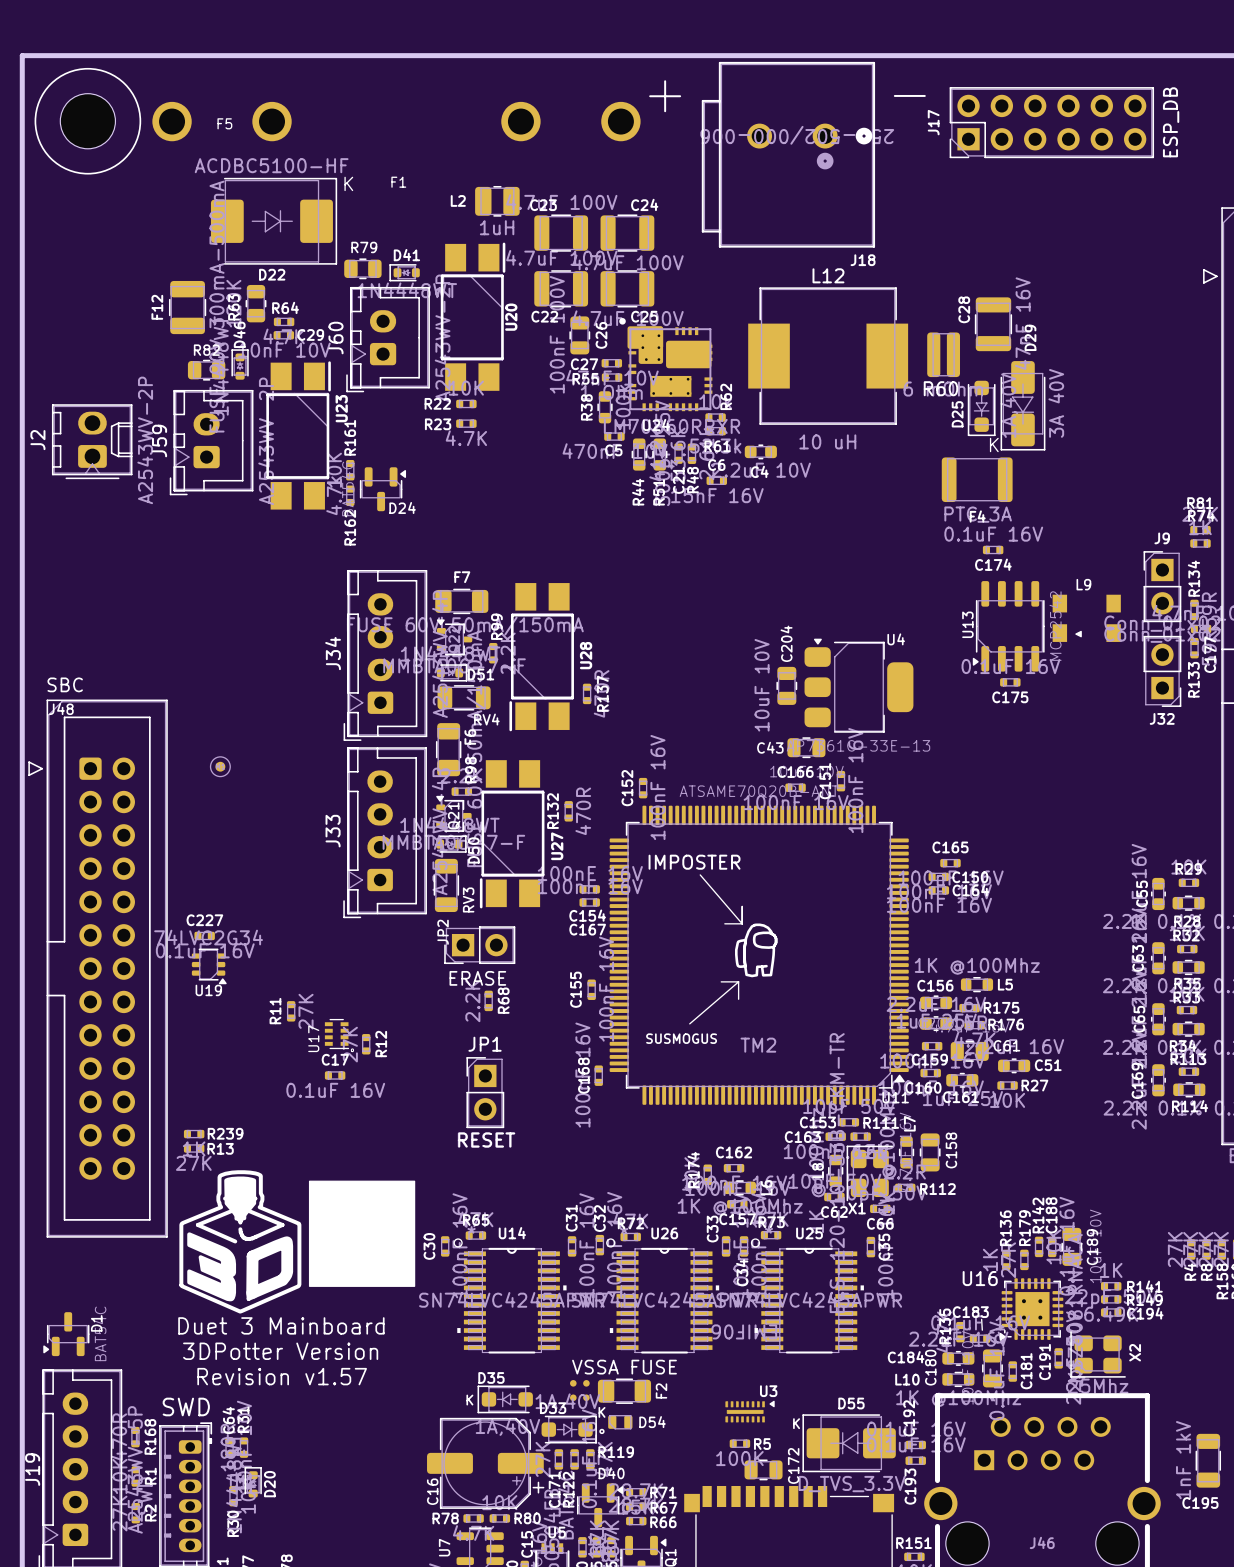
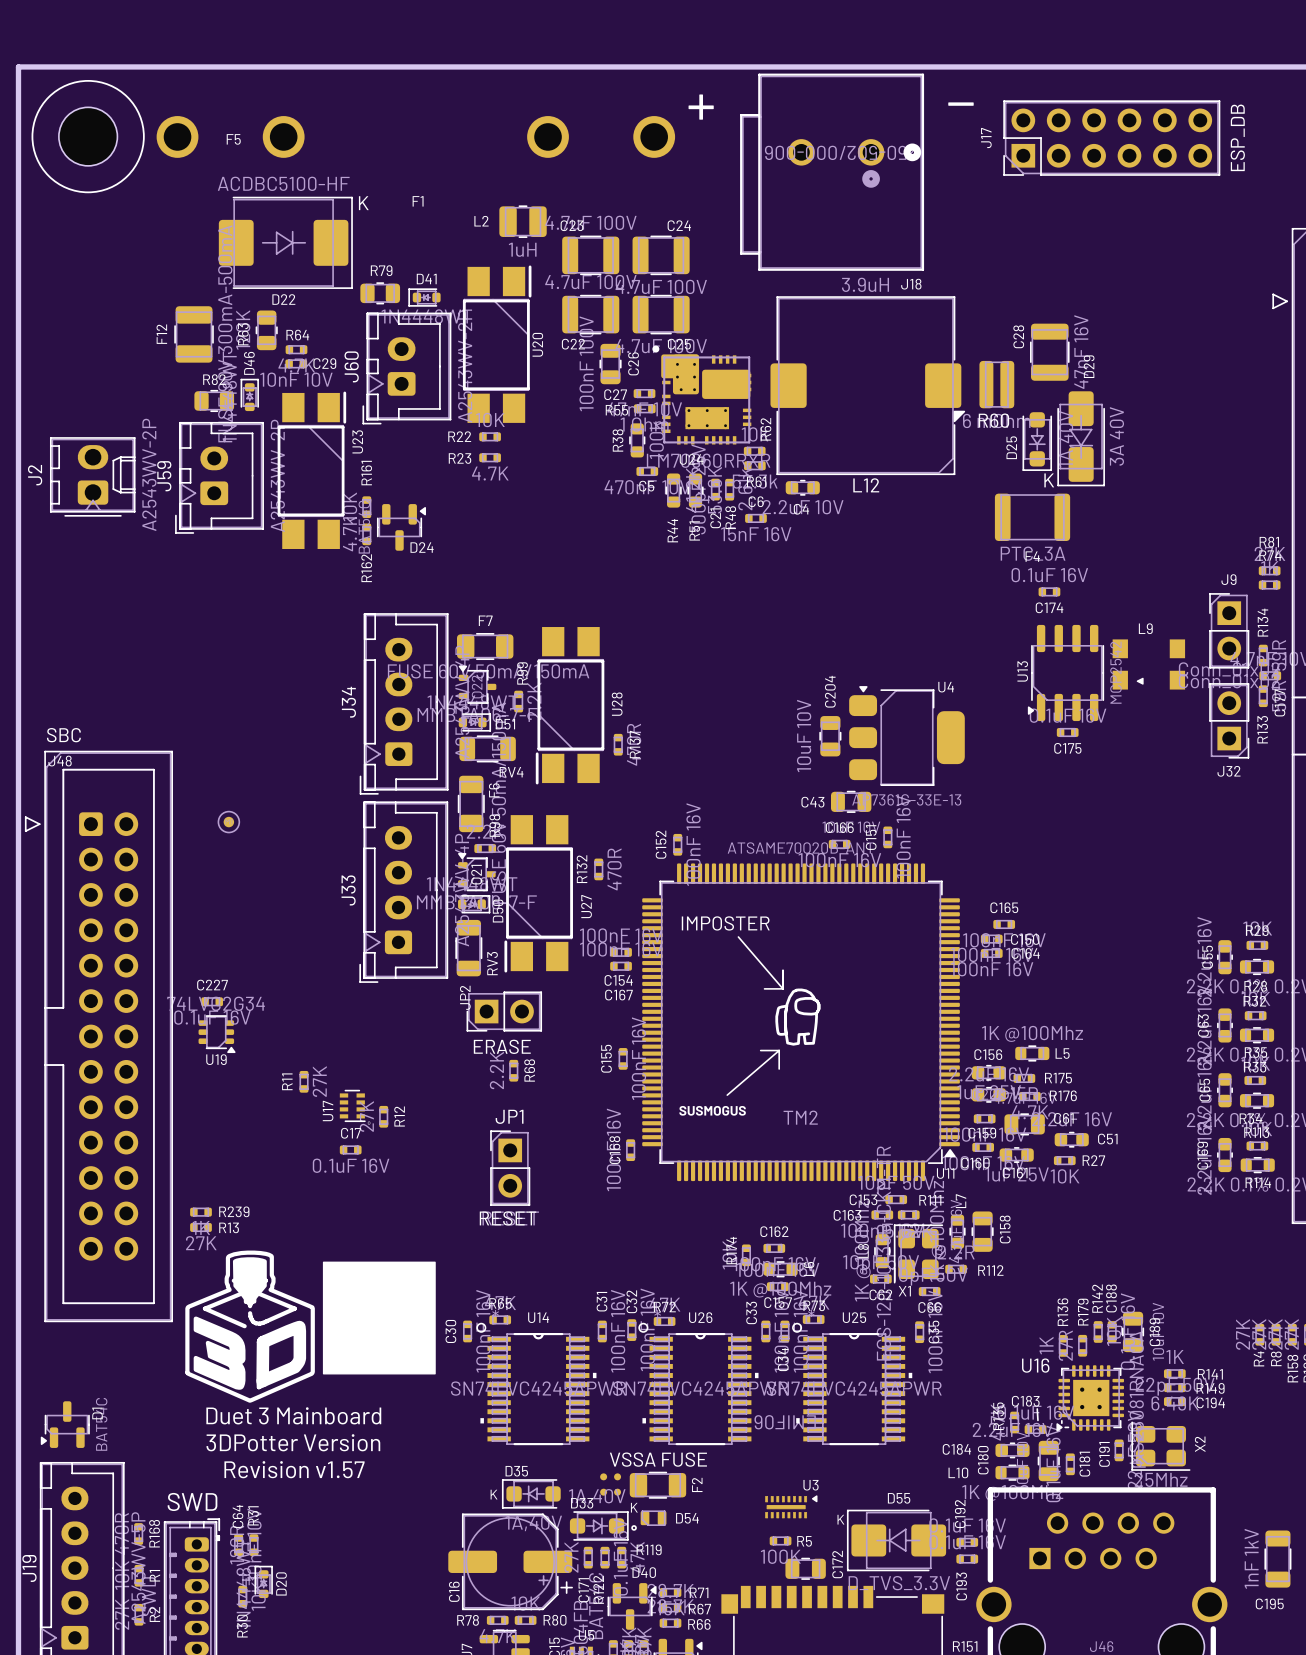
L12 name position: L12 (828, 275) -> L12 (866, 485)
L12 footprint: [748, 287, 909, 425] -> [770, 296, 966, 476]
L12 value: 10 uH (827, 441) -> 3.9uH (865, 284)

